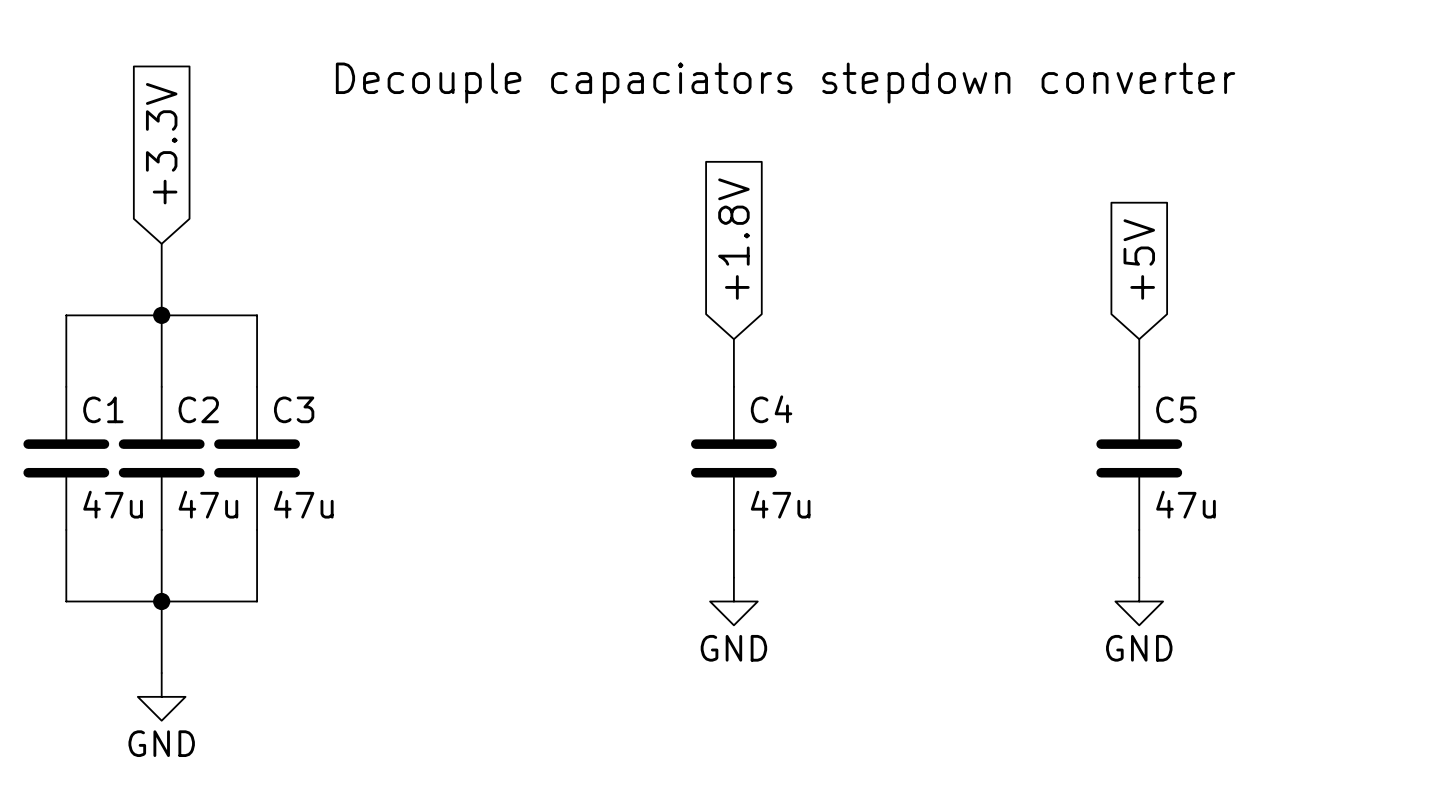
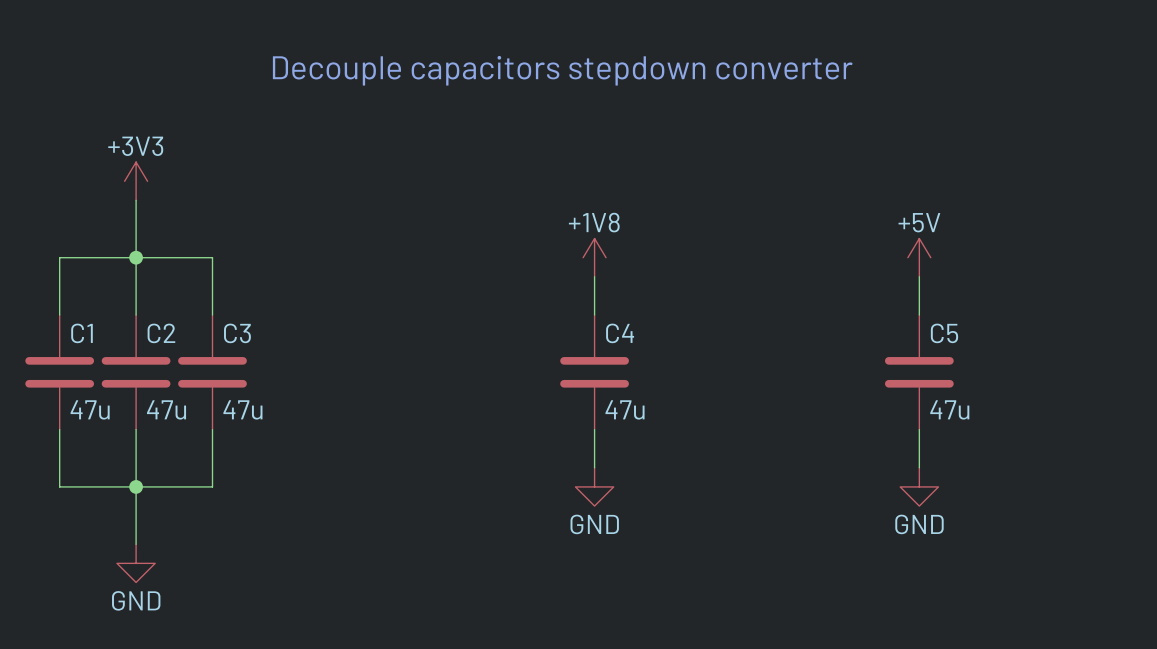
text: Decouple capaciators stepdown converter (785, 83) -> Decouple capacitors stepdown converter (562, 70)
global label: +3.3V (161, 143) -> none
power symbol: none -> +3V3 (136, 181)
global label: +1.8V (733, 239) -> none
global label: +5V (1139, 259) -> none
power symbol: none -> +1V8 (594, 257)
power symbol: none -> +5V (919, 257)

